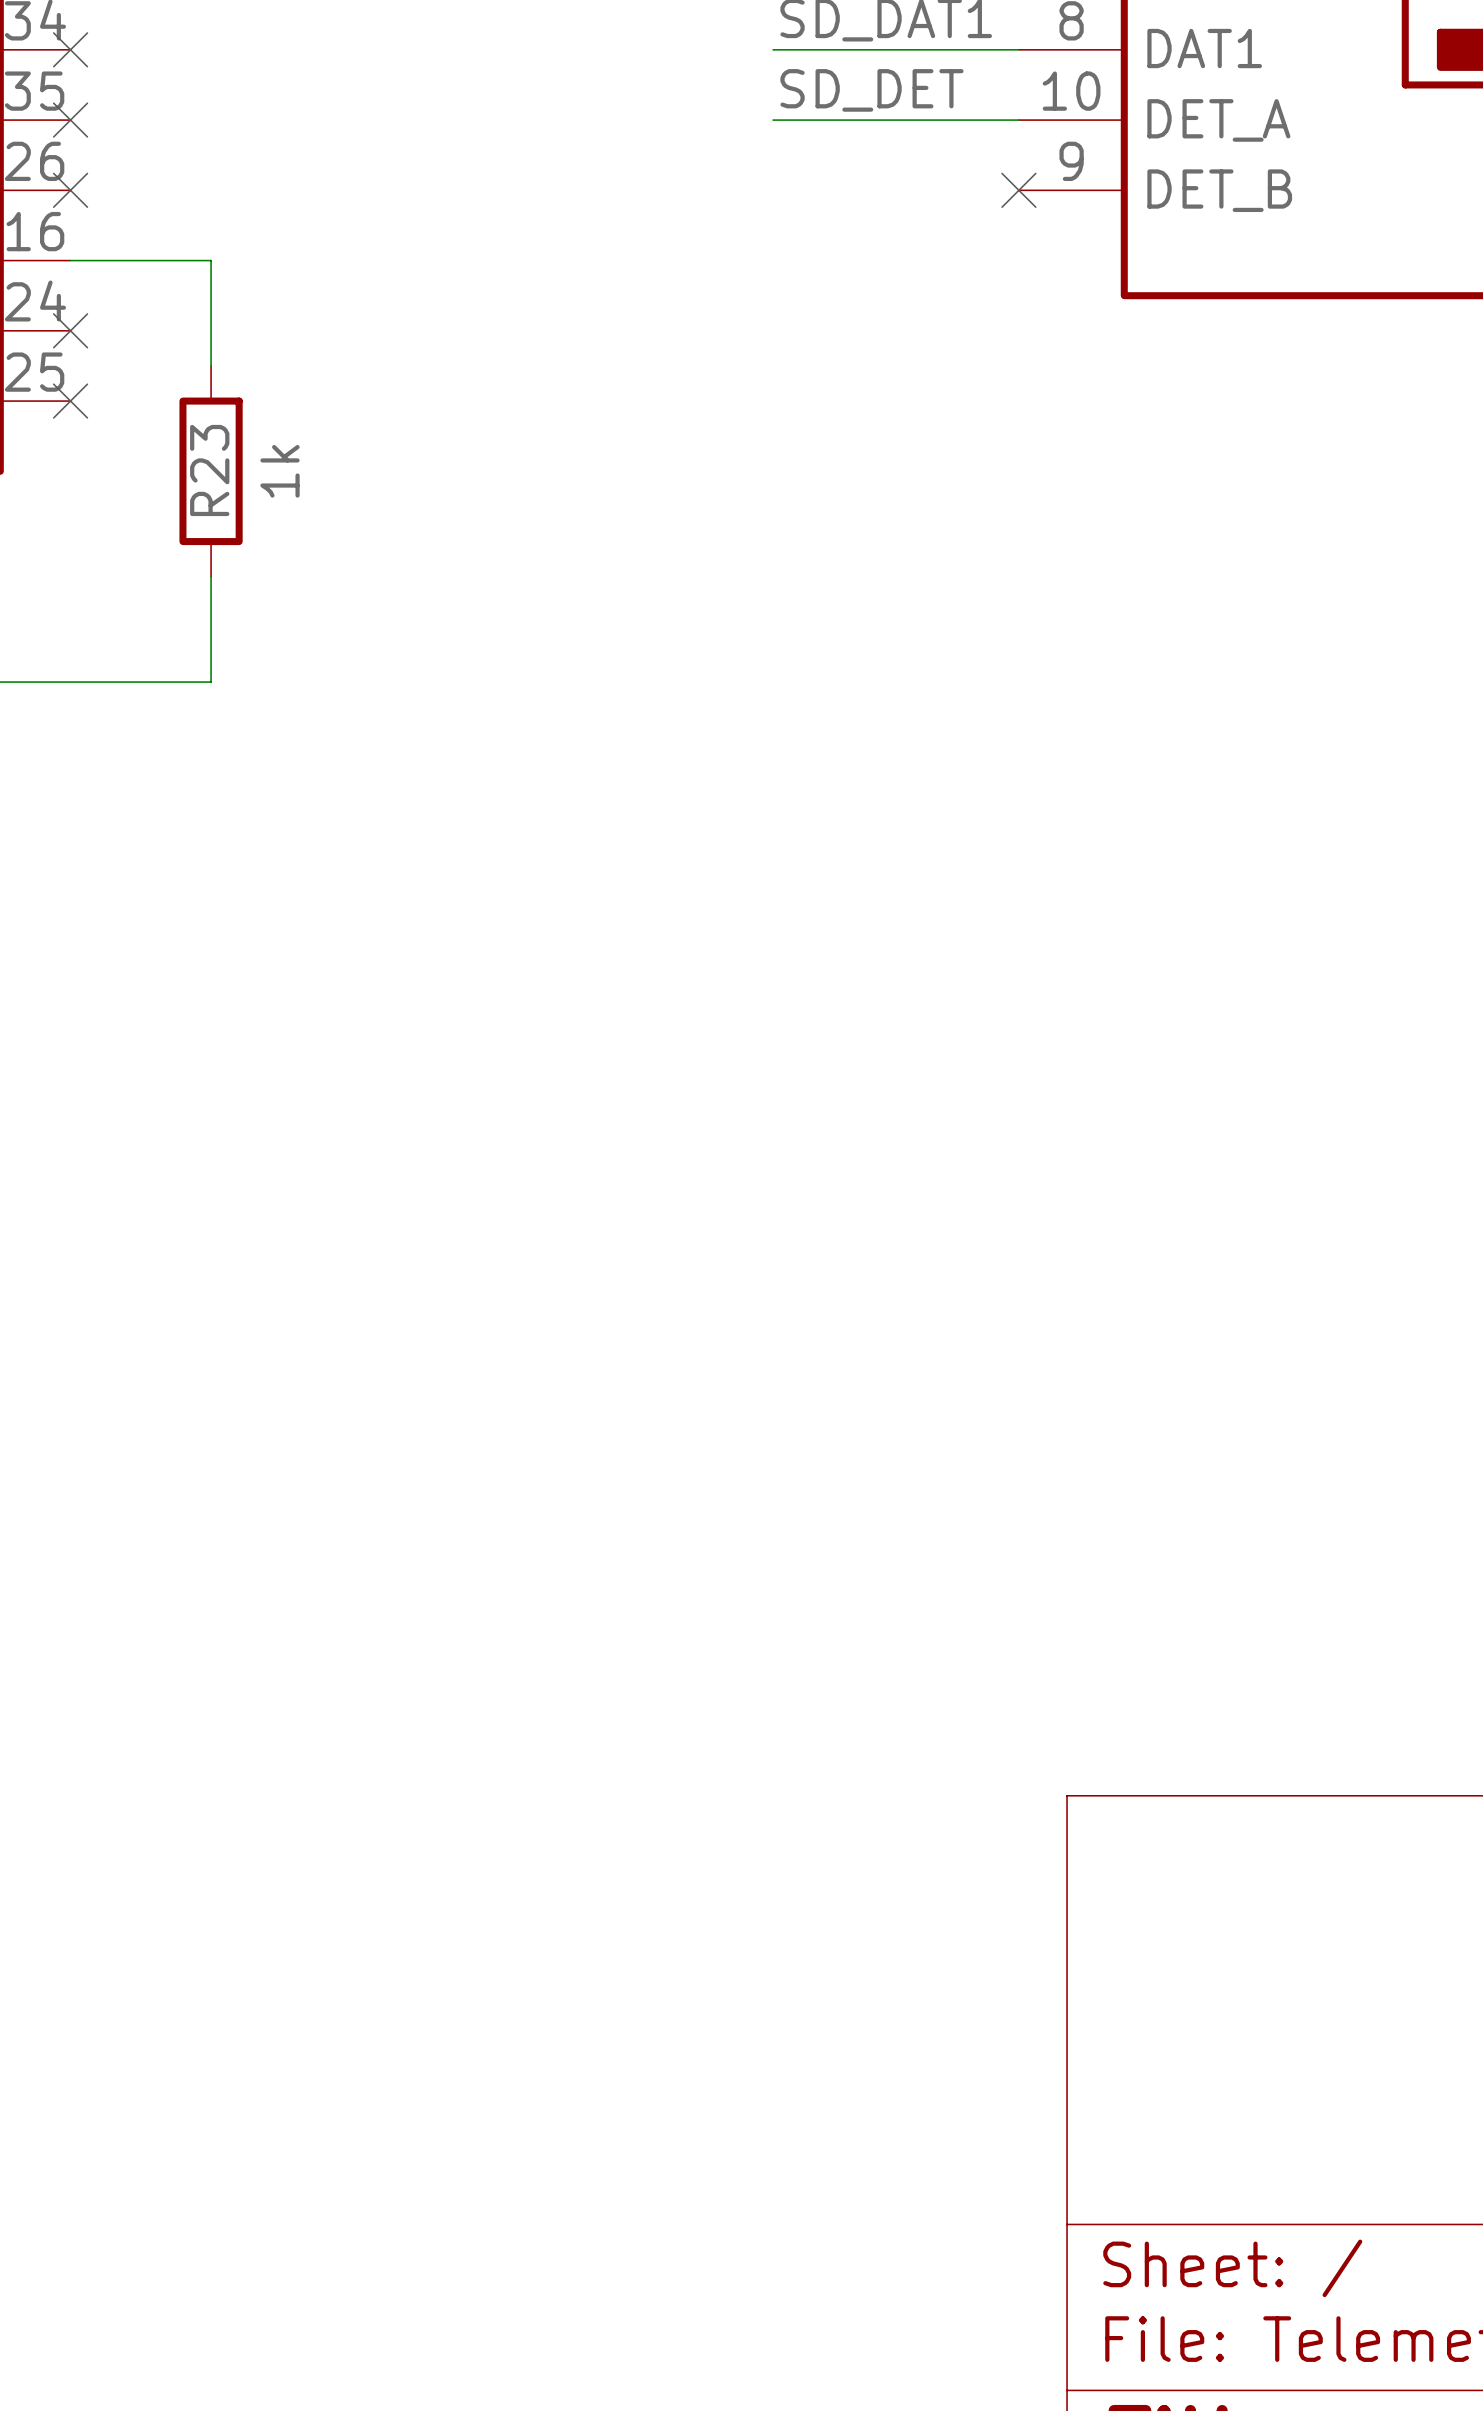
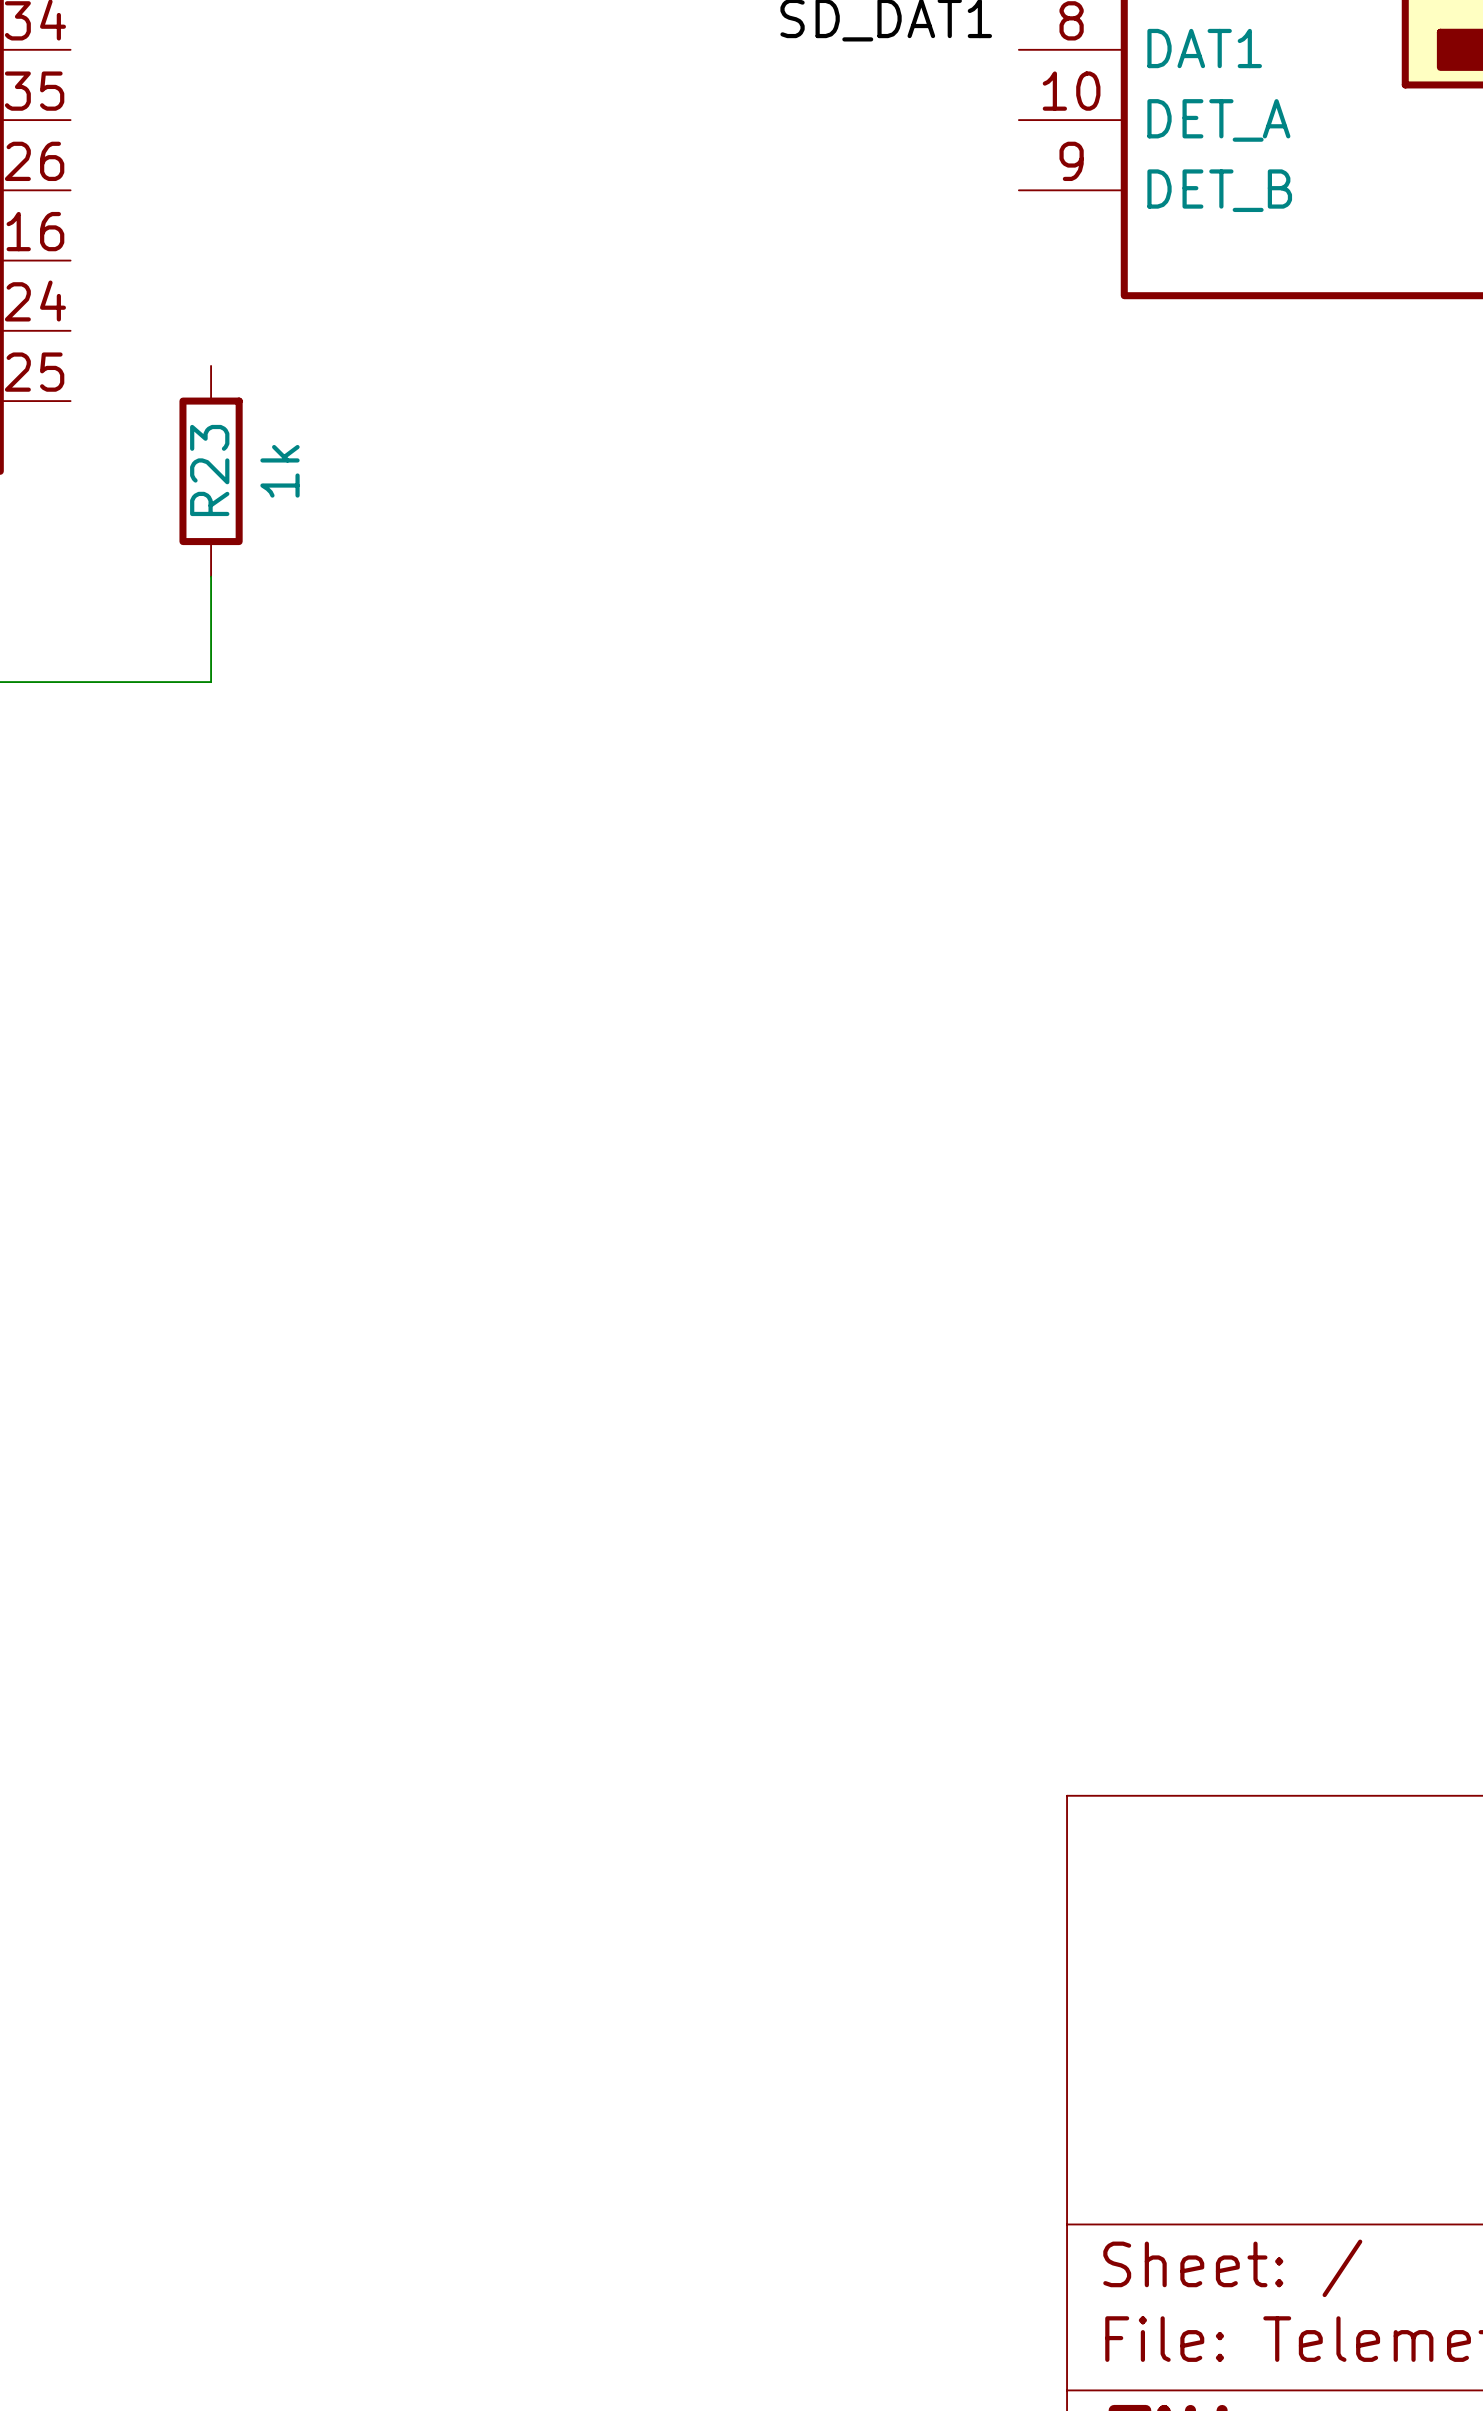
no-connect mark: (70, 49) -> none
wire: (773, 49) (1018, 49) -> none
label: SD_DET (871, 90) -> none
no-connect mark: (70, 120) -> none
wire: (773, 120) (1018, 120) -> none
no-connect mark: (70, 190) -> none
no-connect mark: (1018, 190) -> none
wire: (70, 260) (211, 260) (211, 365) -> none
no-connect mark: (70, 330) -> none
no-connect mark: (70, 401) -> none

